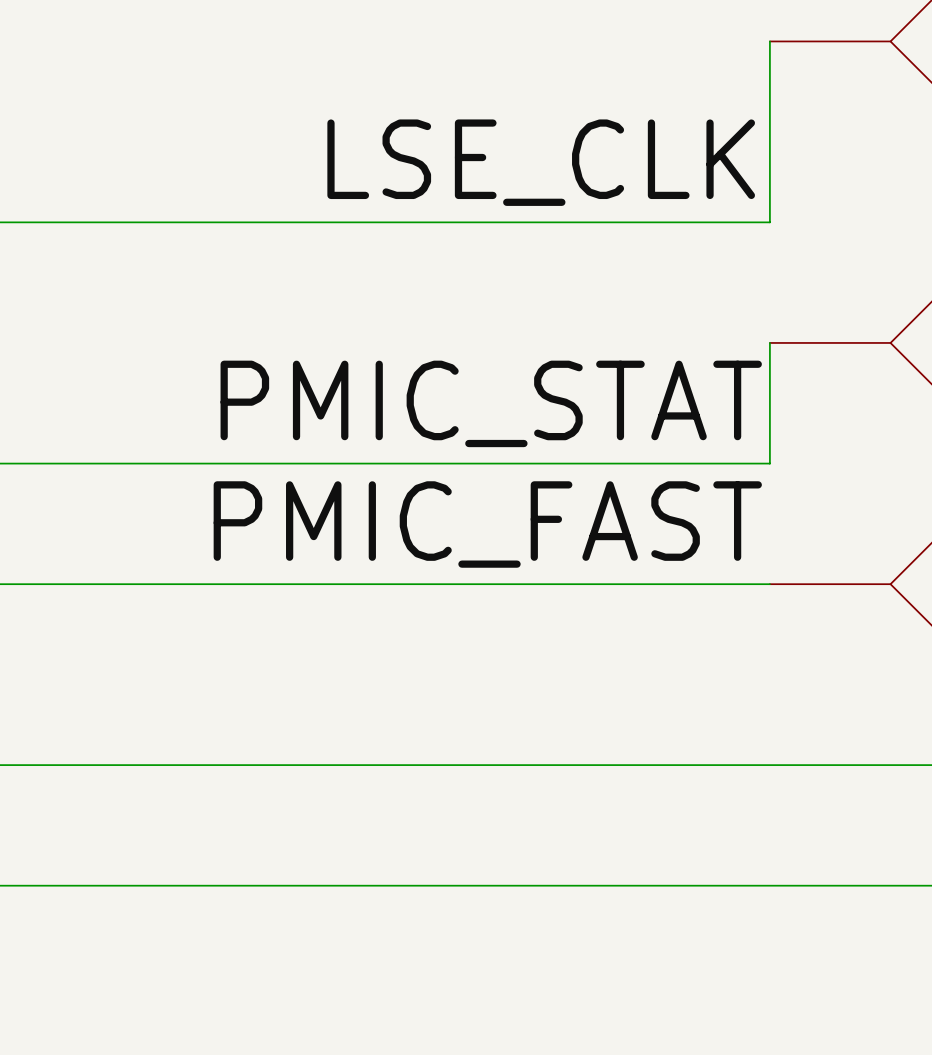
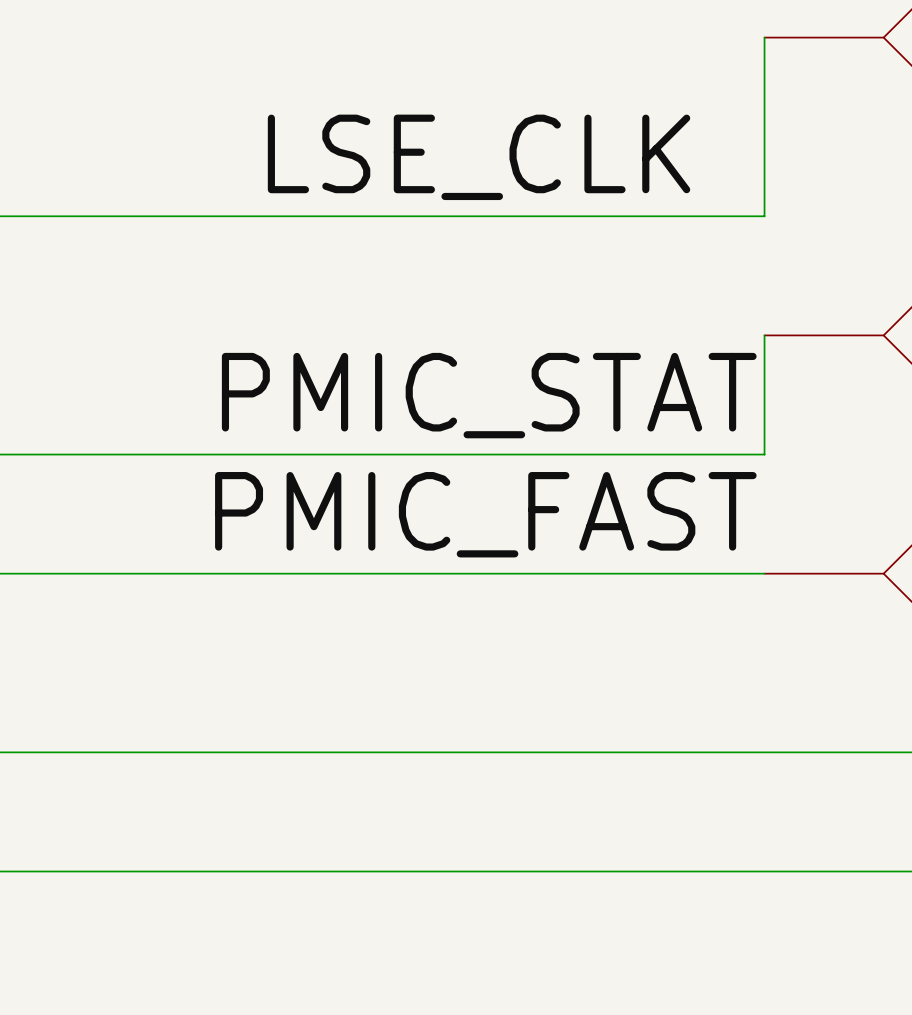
label position: LSE_CLK (541, 162) -> LSE_CLK (479, 157)

